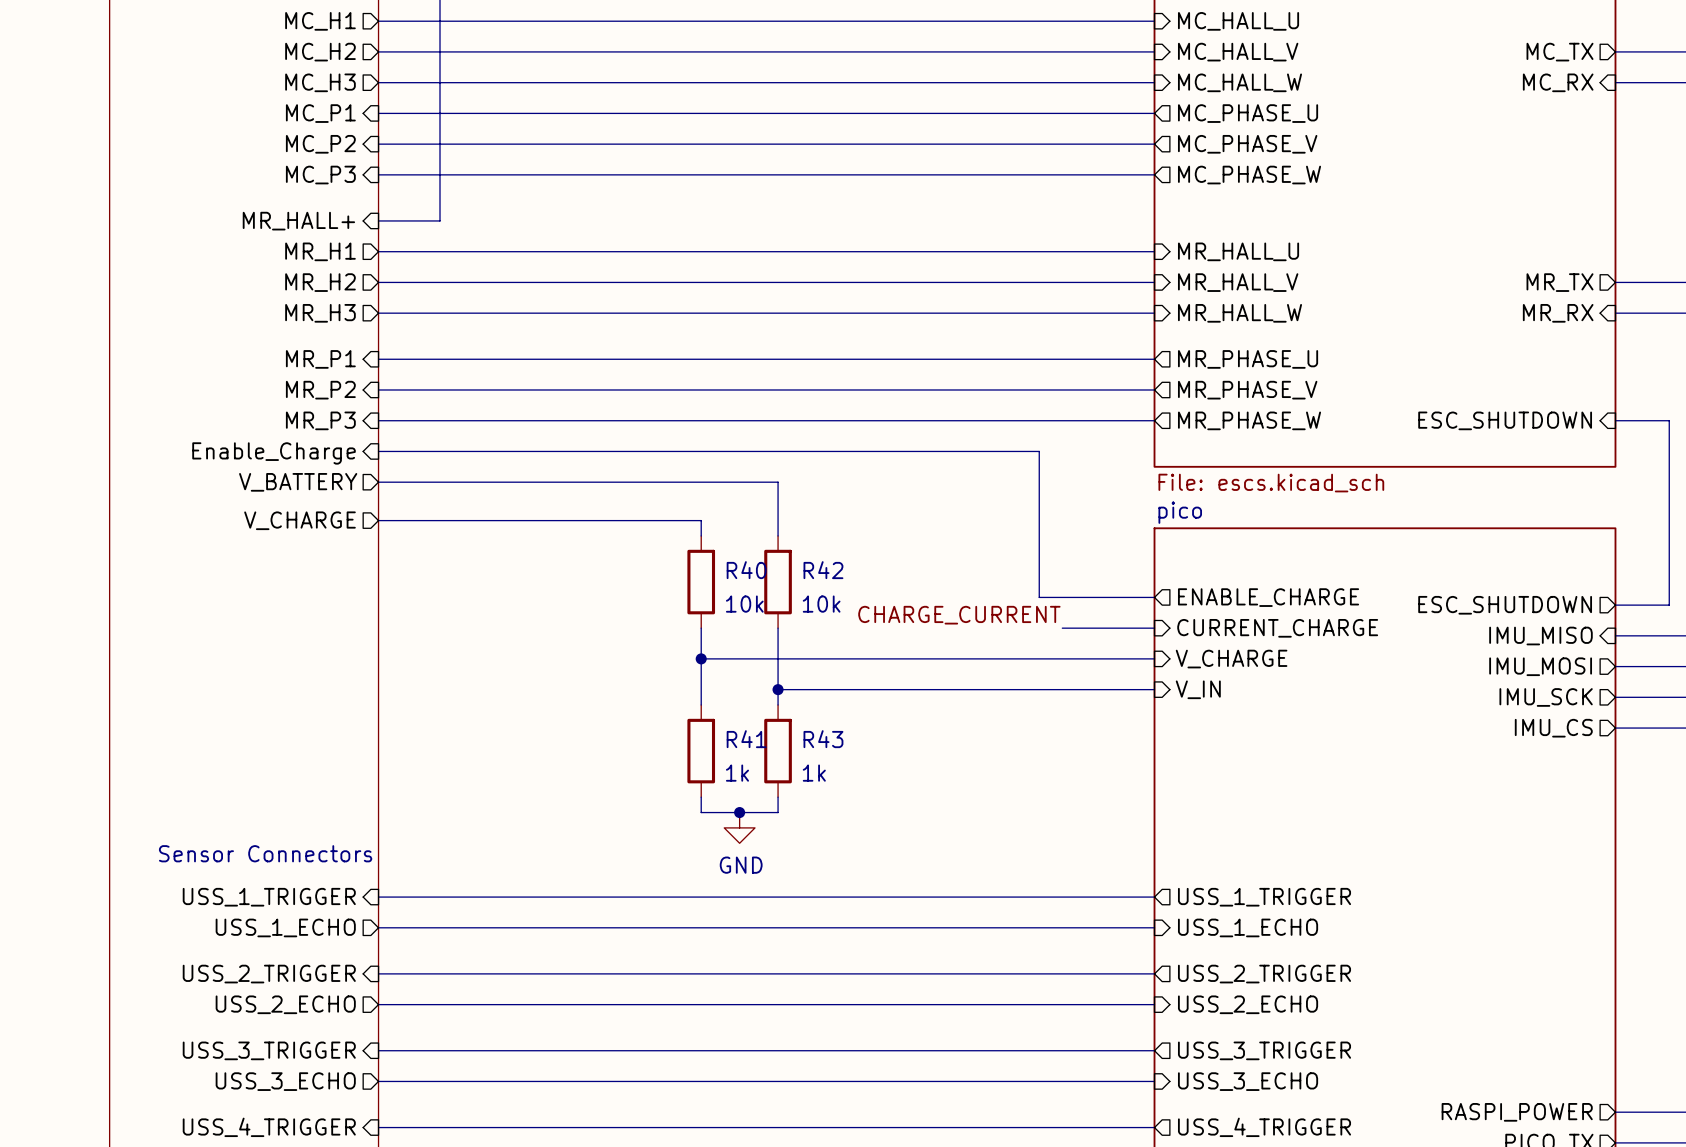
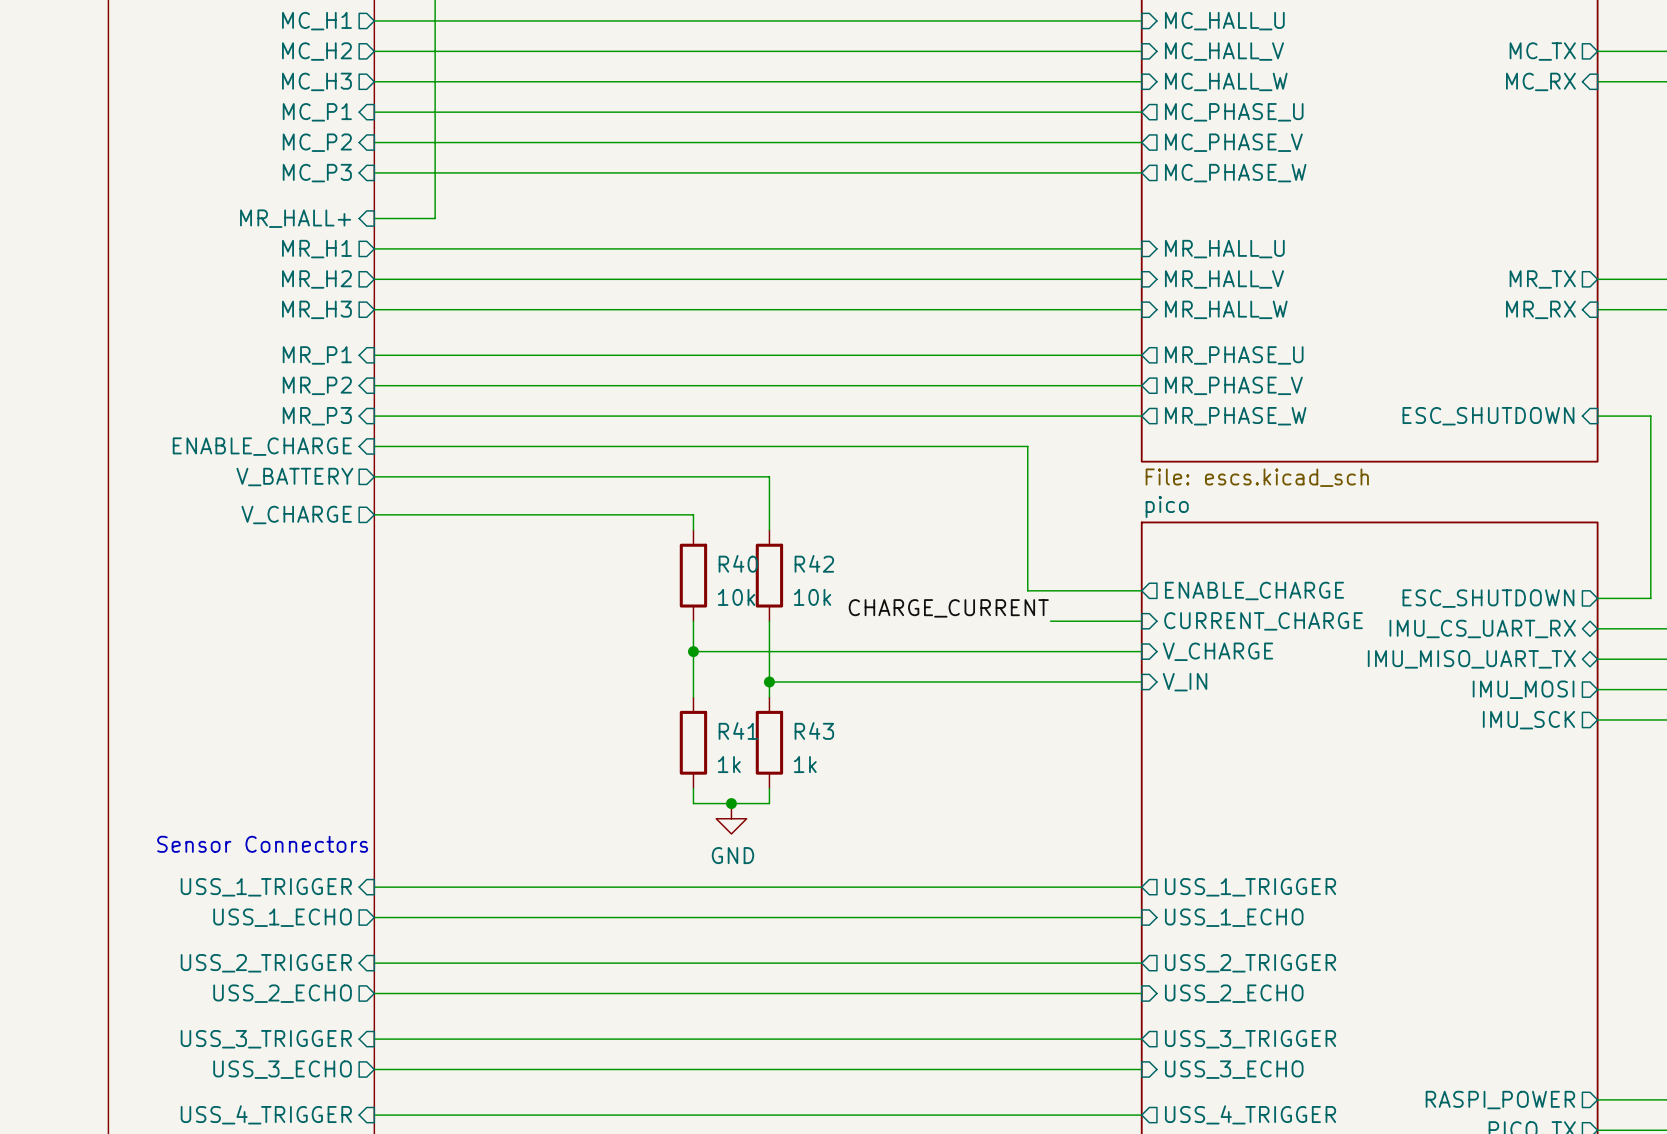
sheet pin: Enable_Charge (274, 453) -> ENABLE_CHARGE (262, 446)
sheet pin shape: input (1540, 636) -> bidirectional (1482, 628)
sheet pin: IMU_MISO (1540, 636) -> IMU_CS_UART_RX (1482, 628)
sheet pin shape: output (1540, 666) -> bidirectional (1471, 659)
sheet pin: IMU_MOSI (1540, 666) -> IMU_MISO_UART_TX (1471, 659)
sheet pin: IMU_SCK (1546, 697) -> IMU_MOSI (1523, 689)
sheet pin: IMU_CS (1553, 728) -> IMU_SCK (1529, 720)

